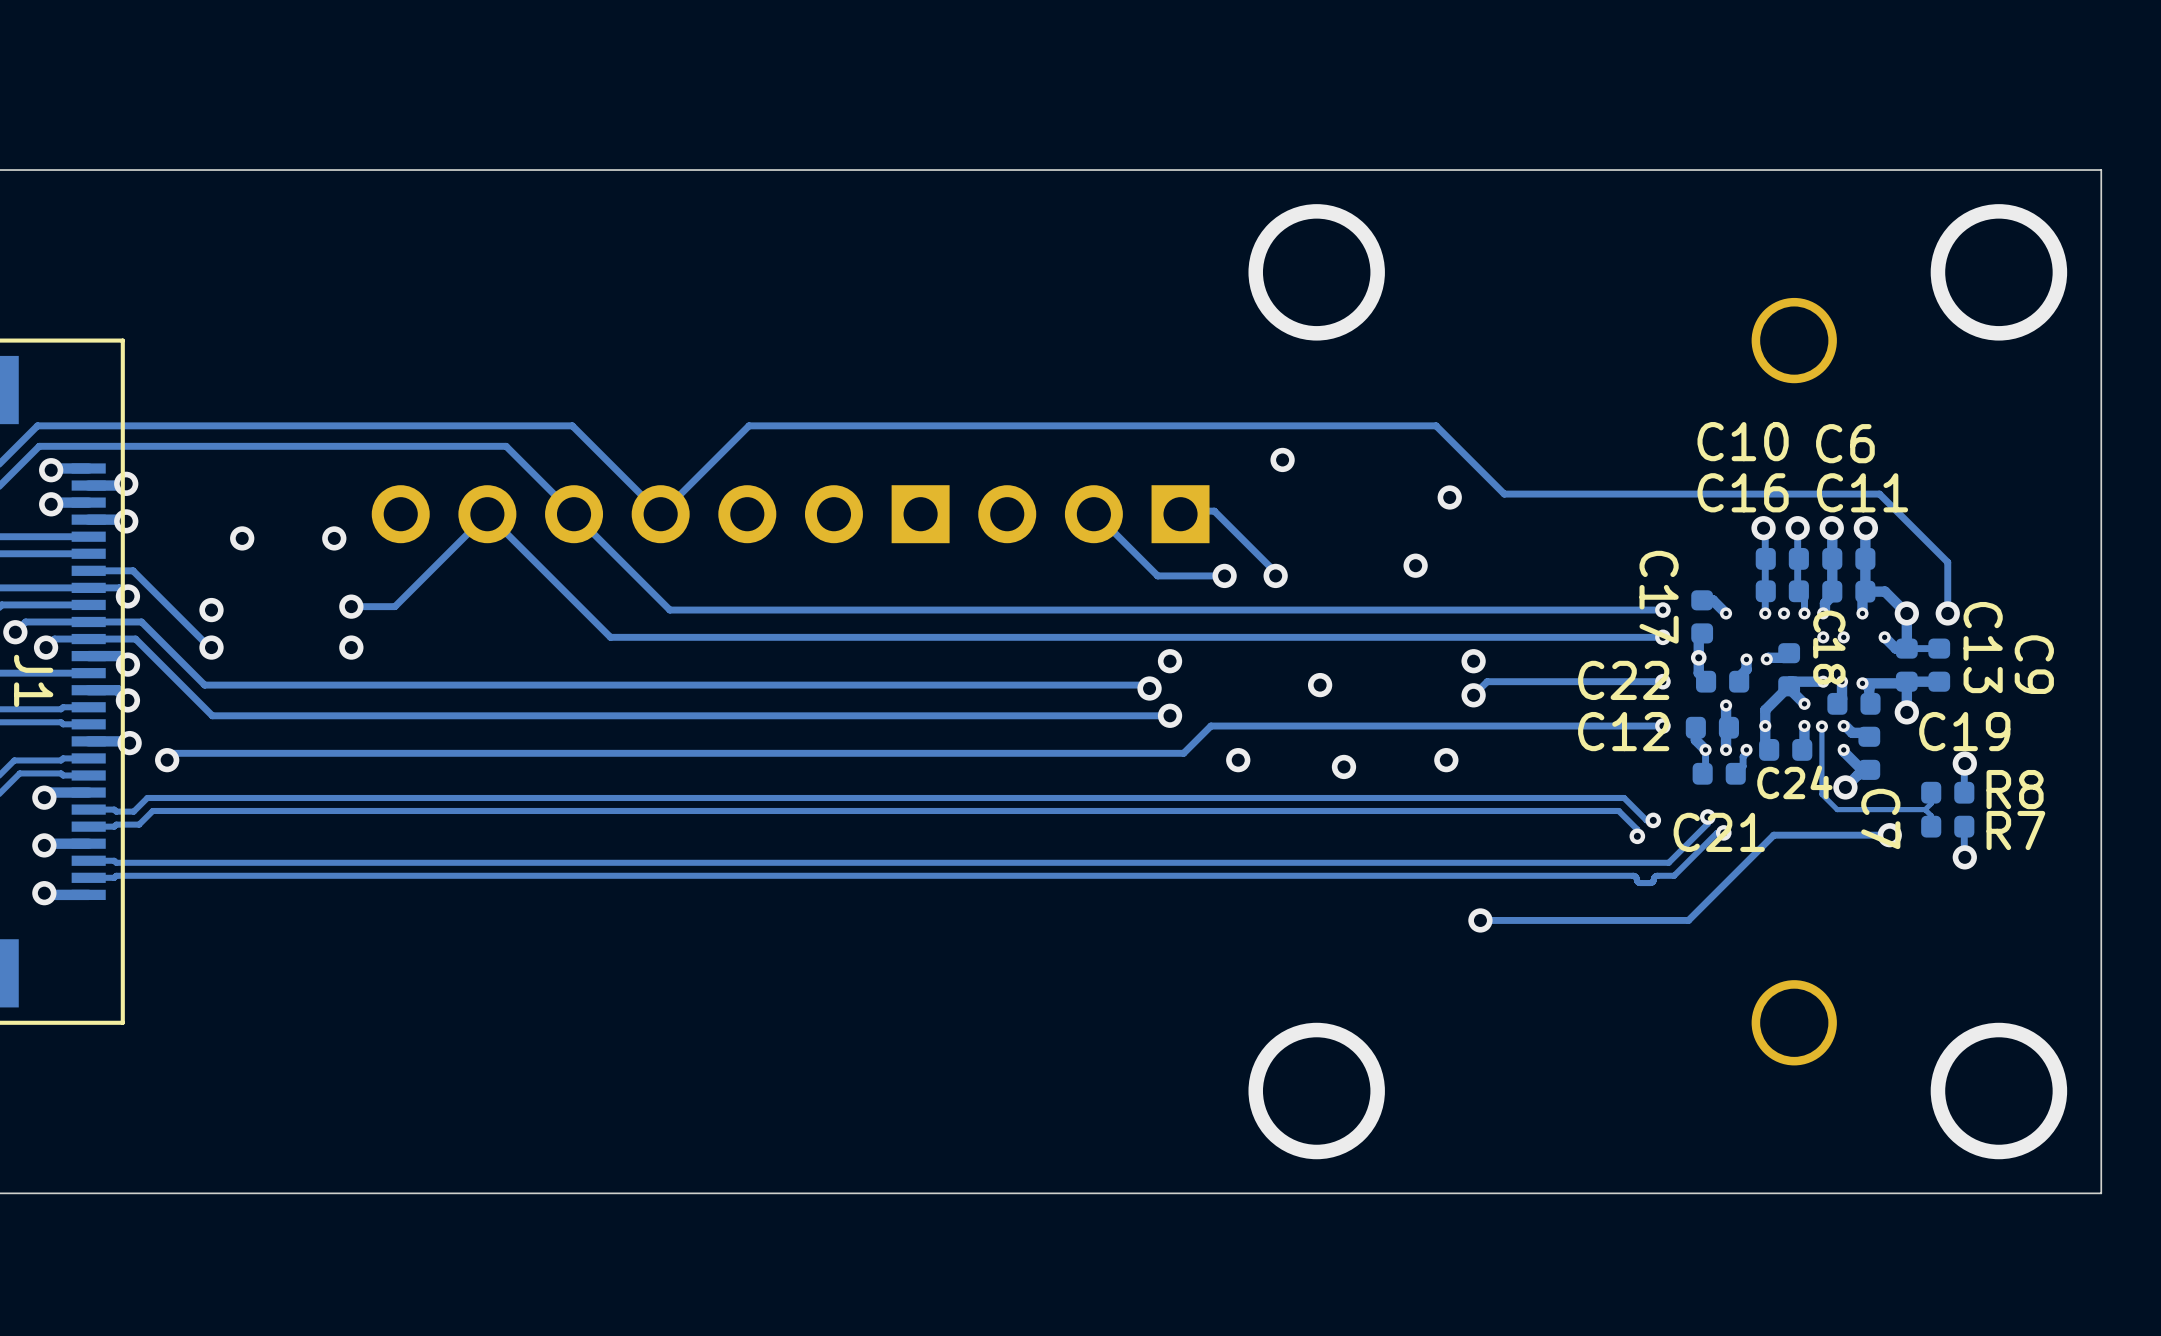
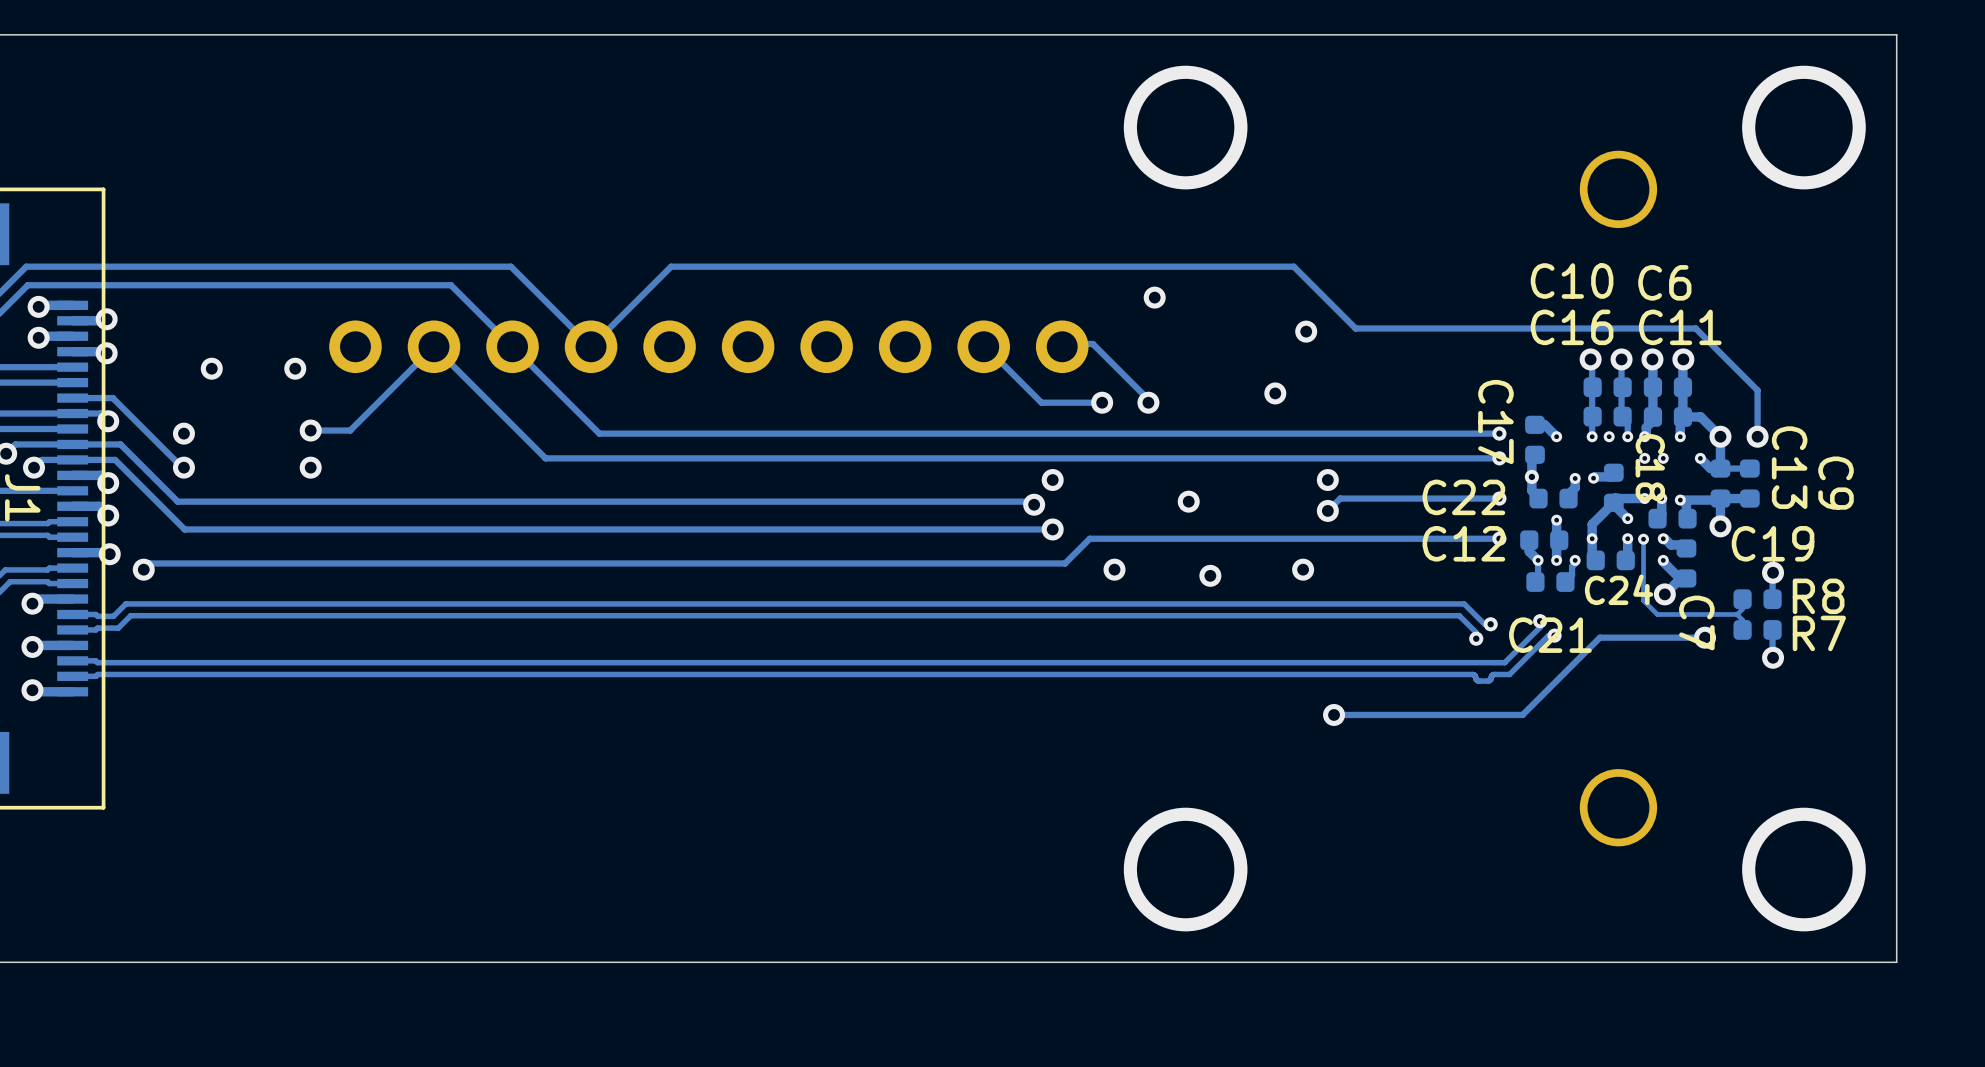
part footprint: [371, 485, 950, 544] -> [329, 320, 853, 374]
part footprint: [978, 485, 1210, 544] -> [878, 320, 1089, 374]

